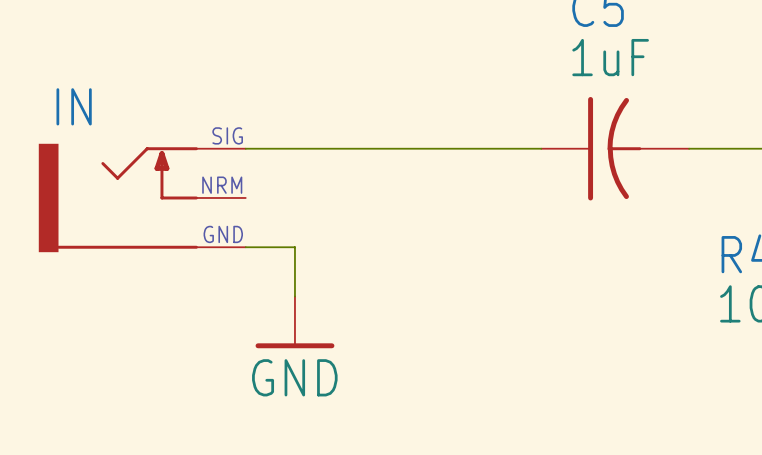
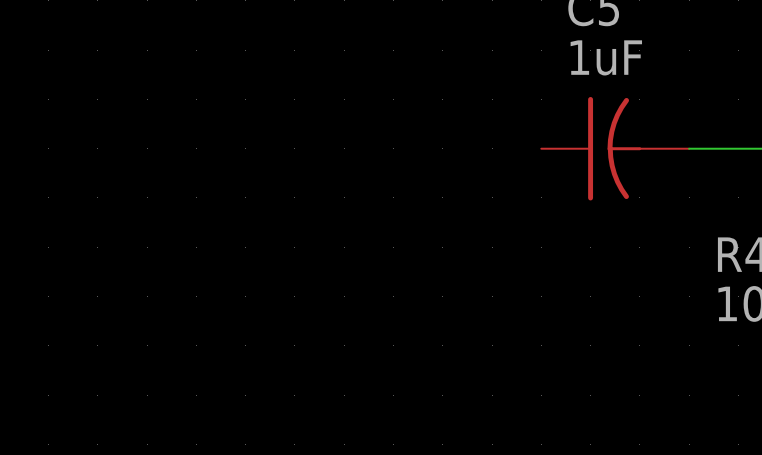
wire: (245, 148) (541, 148) -> none
IN: (142, 197) -> none
wire: (245, 247) (294, 247) (294, 296) -> none
power symbol: GND (294, 322) -> none

